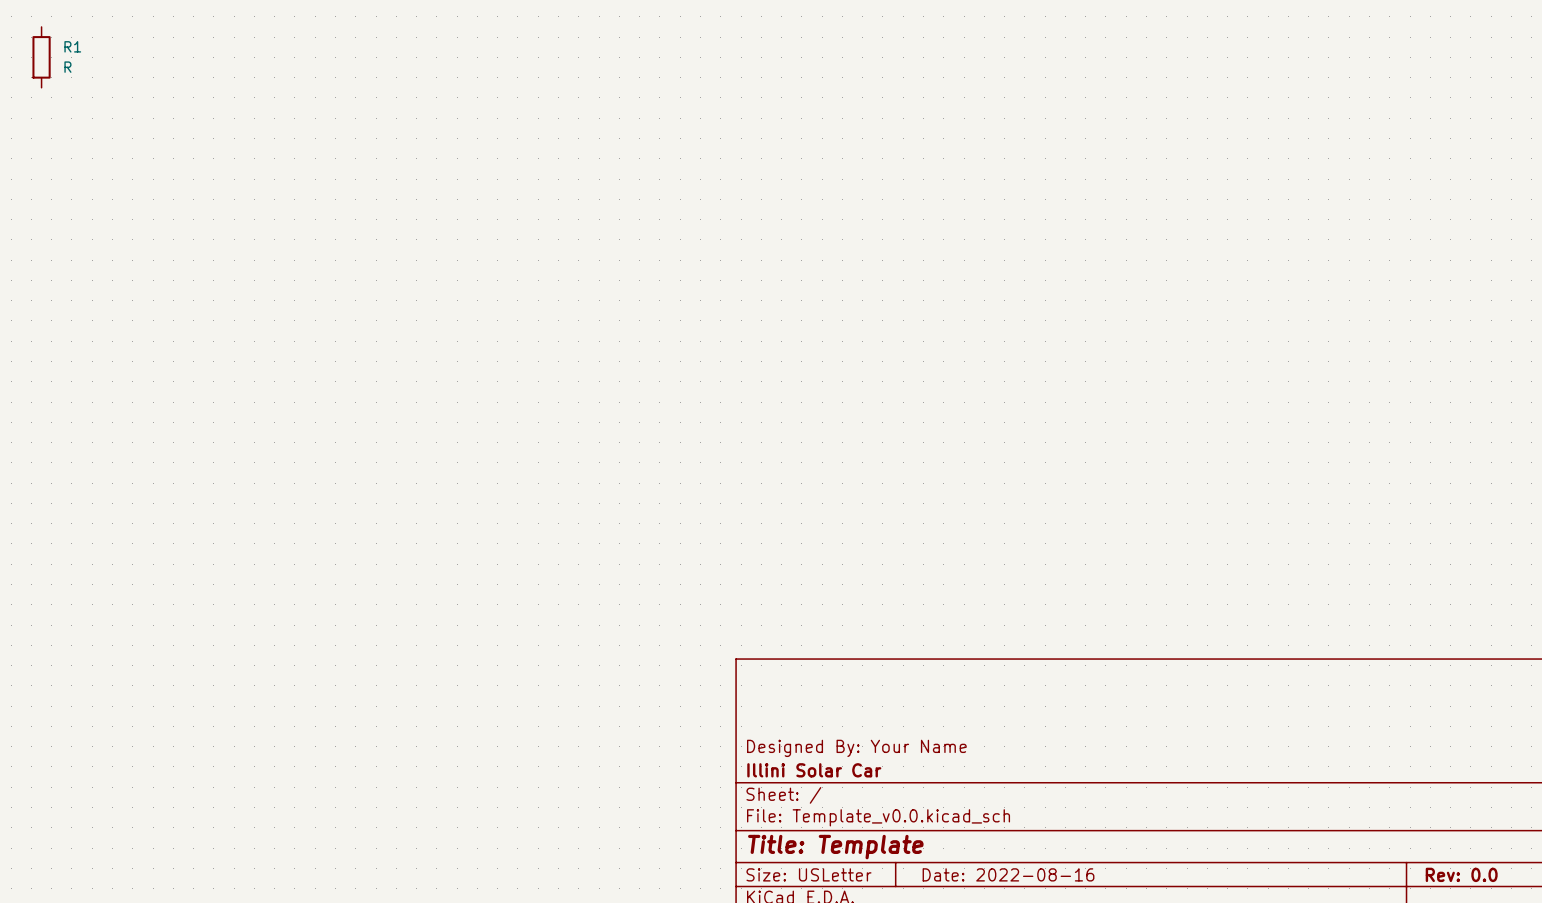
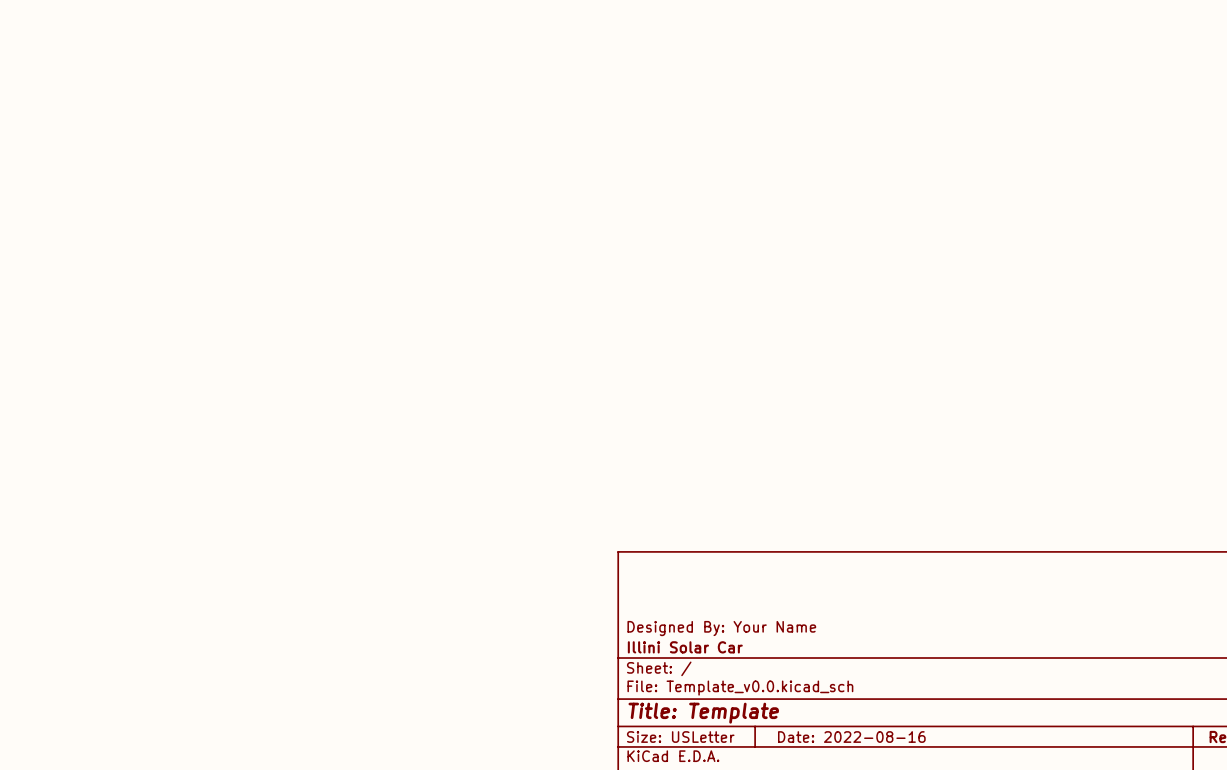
R1: R (41, 57) -> none

